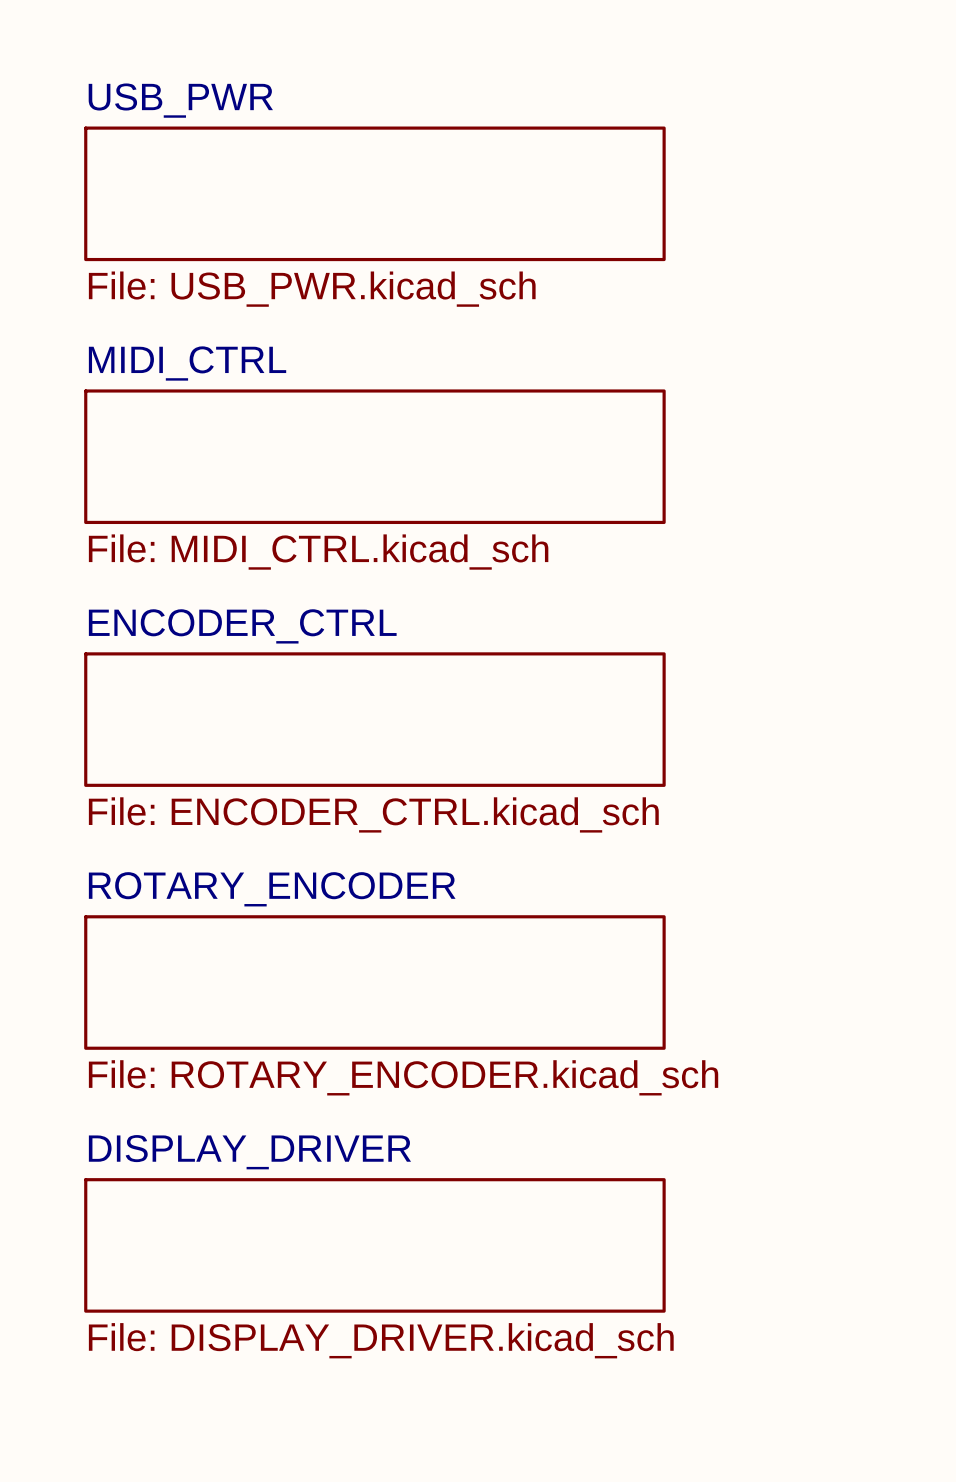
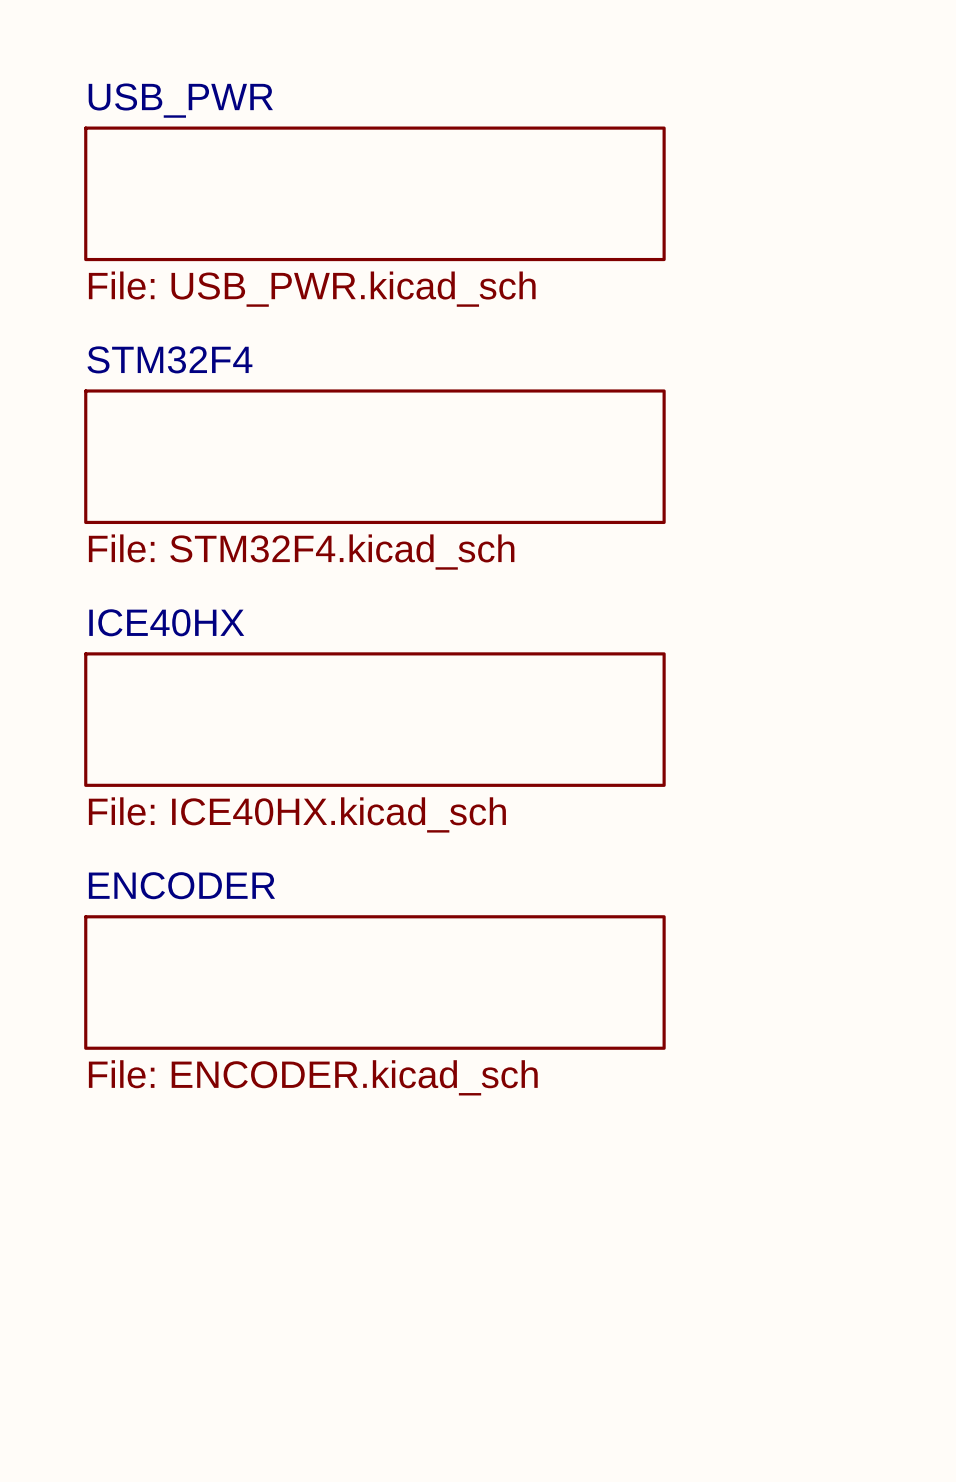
sheet MIDI_CTRL name: MIDI_CTRL (187, 363) -> STM32F4 (169, 359)
sheet MIDI_CTRL value: File: MIDI_CTRL.kicad_sch (318, 552) -> File: STM32F4.kicad_sch (301, 552)
sheet ENCODER_CTRL name: ENCODER_CTRL (242, 626) -> ICE40HX (166, 622)
sheet ENCODER_CTRL value: File: ENCODER_CTRL.kicad_sch (373, 814) -> File: ICE40HX.kicad_sch (297, 814)
sheet ROTARY_ENCODER name: ROTARY_ENCODER (272, 889) -> ENCODER (181, 885)
sheet ROTARY_ENCODER value: File: ROTARY_ENCODER.kicad_sch (403, 1077) -> File: ENCODER.kicad_sch (313, 1077)
sheet DISPLAY_DRIVER: File: DISPLAY_DRIVER.kicad_sch (374, 1245) -> none

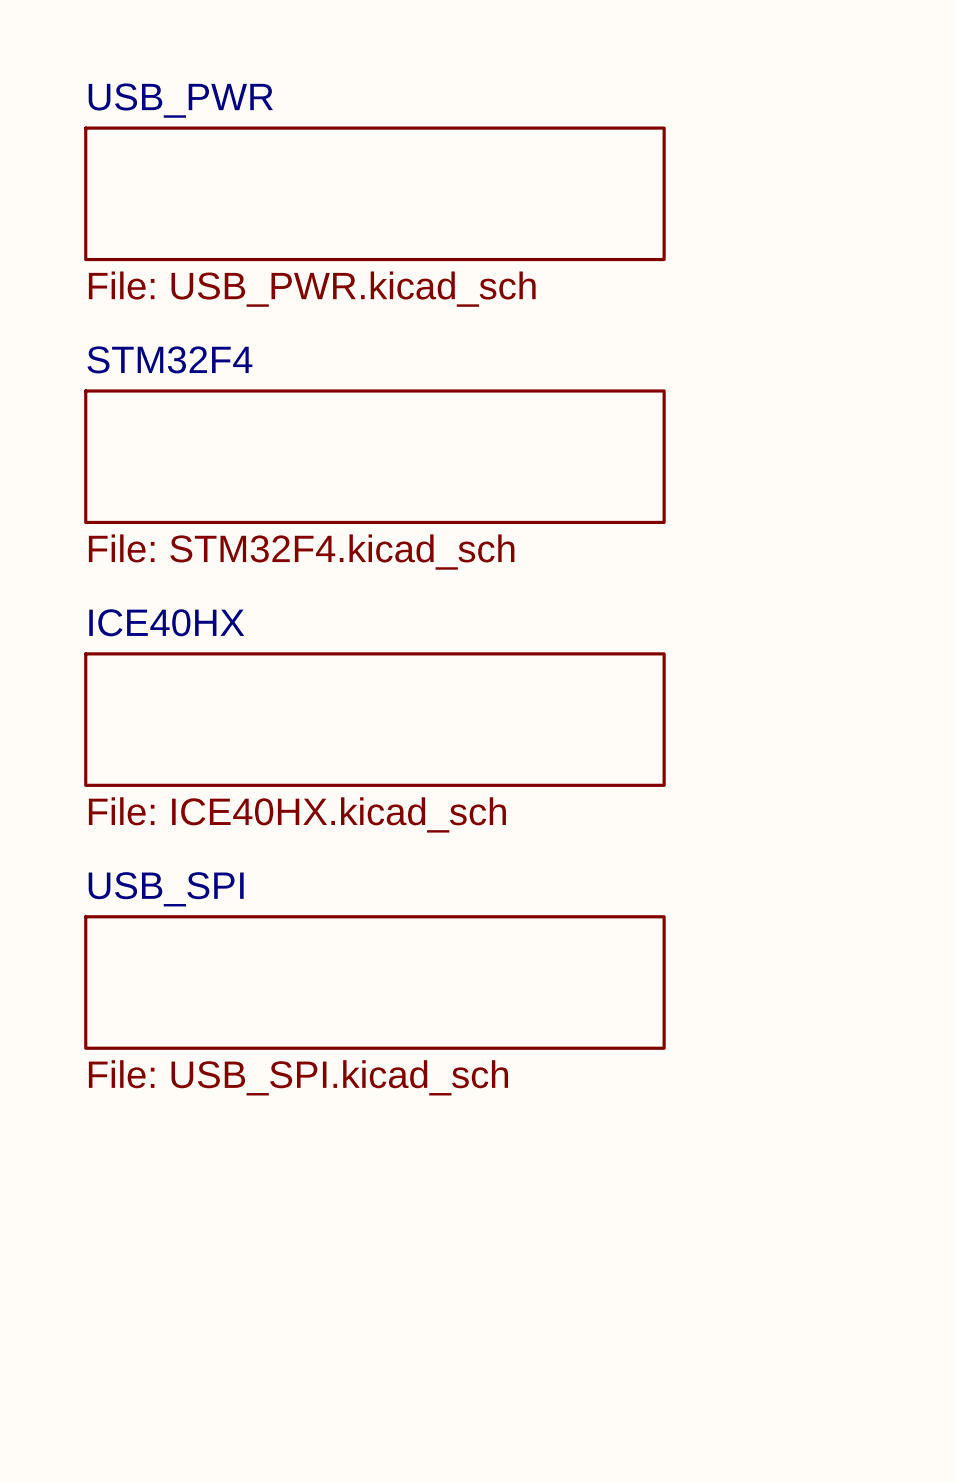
sheet ENCODER name: ENCODER (181, 885) -> USB_SPI (166, 889)
sheet ENCODER value: File: ENCODER.kicad_sch (313, 1077) -> File: USB_SPI.kicad_sch (298, 1077)

